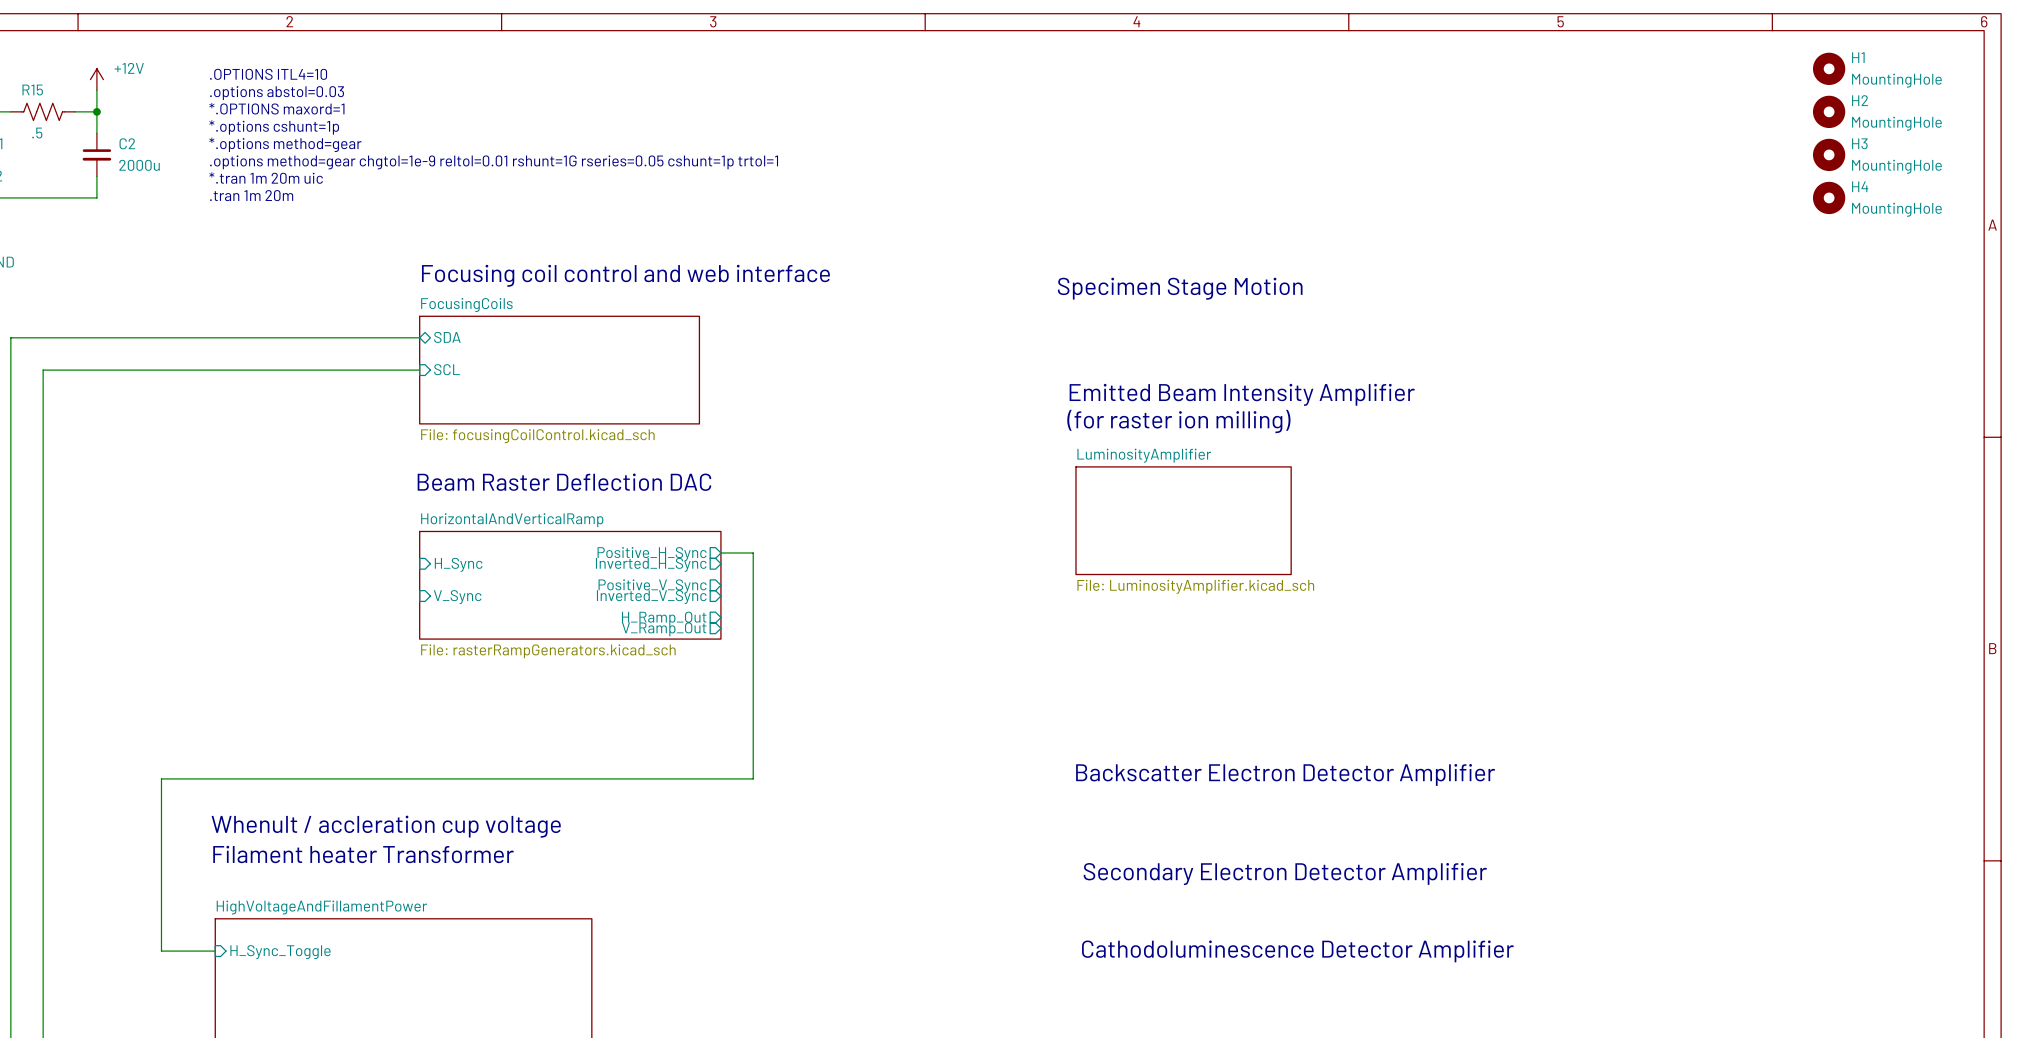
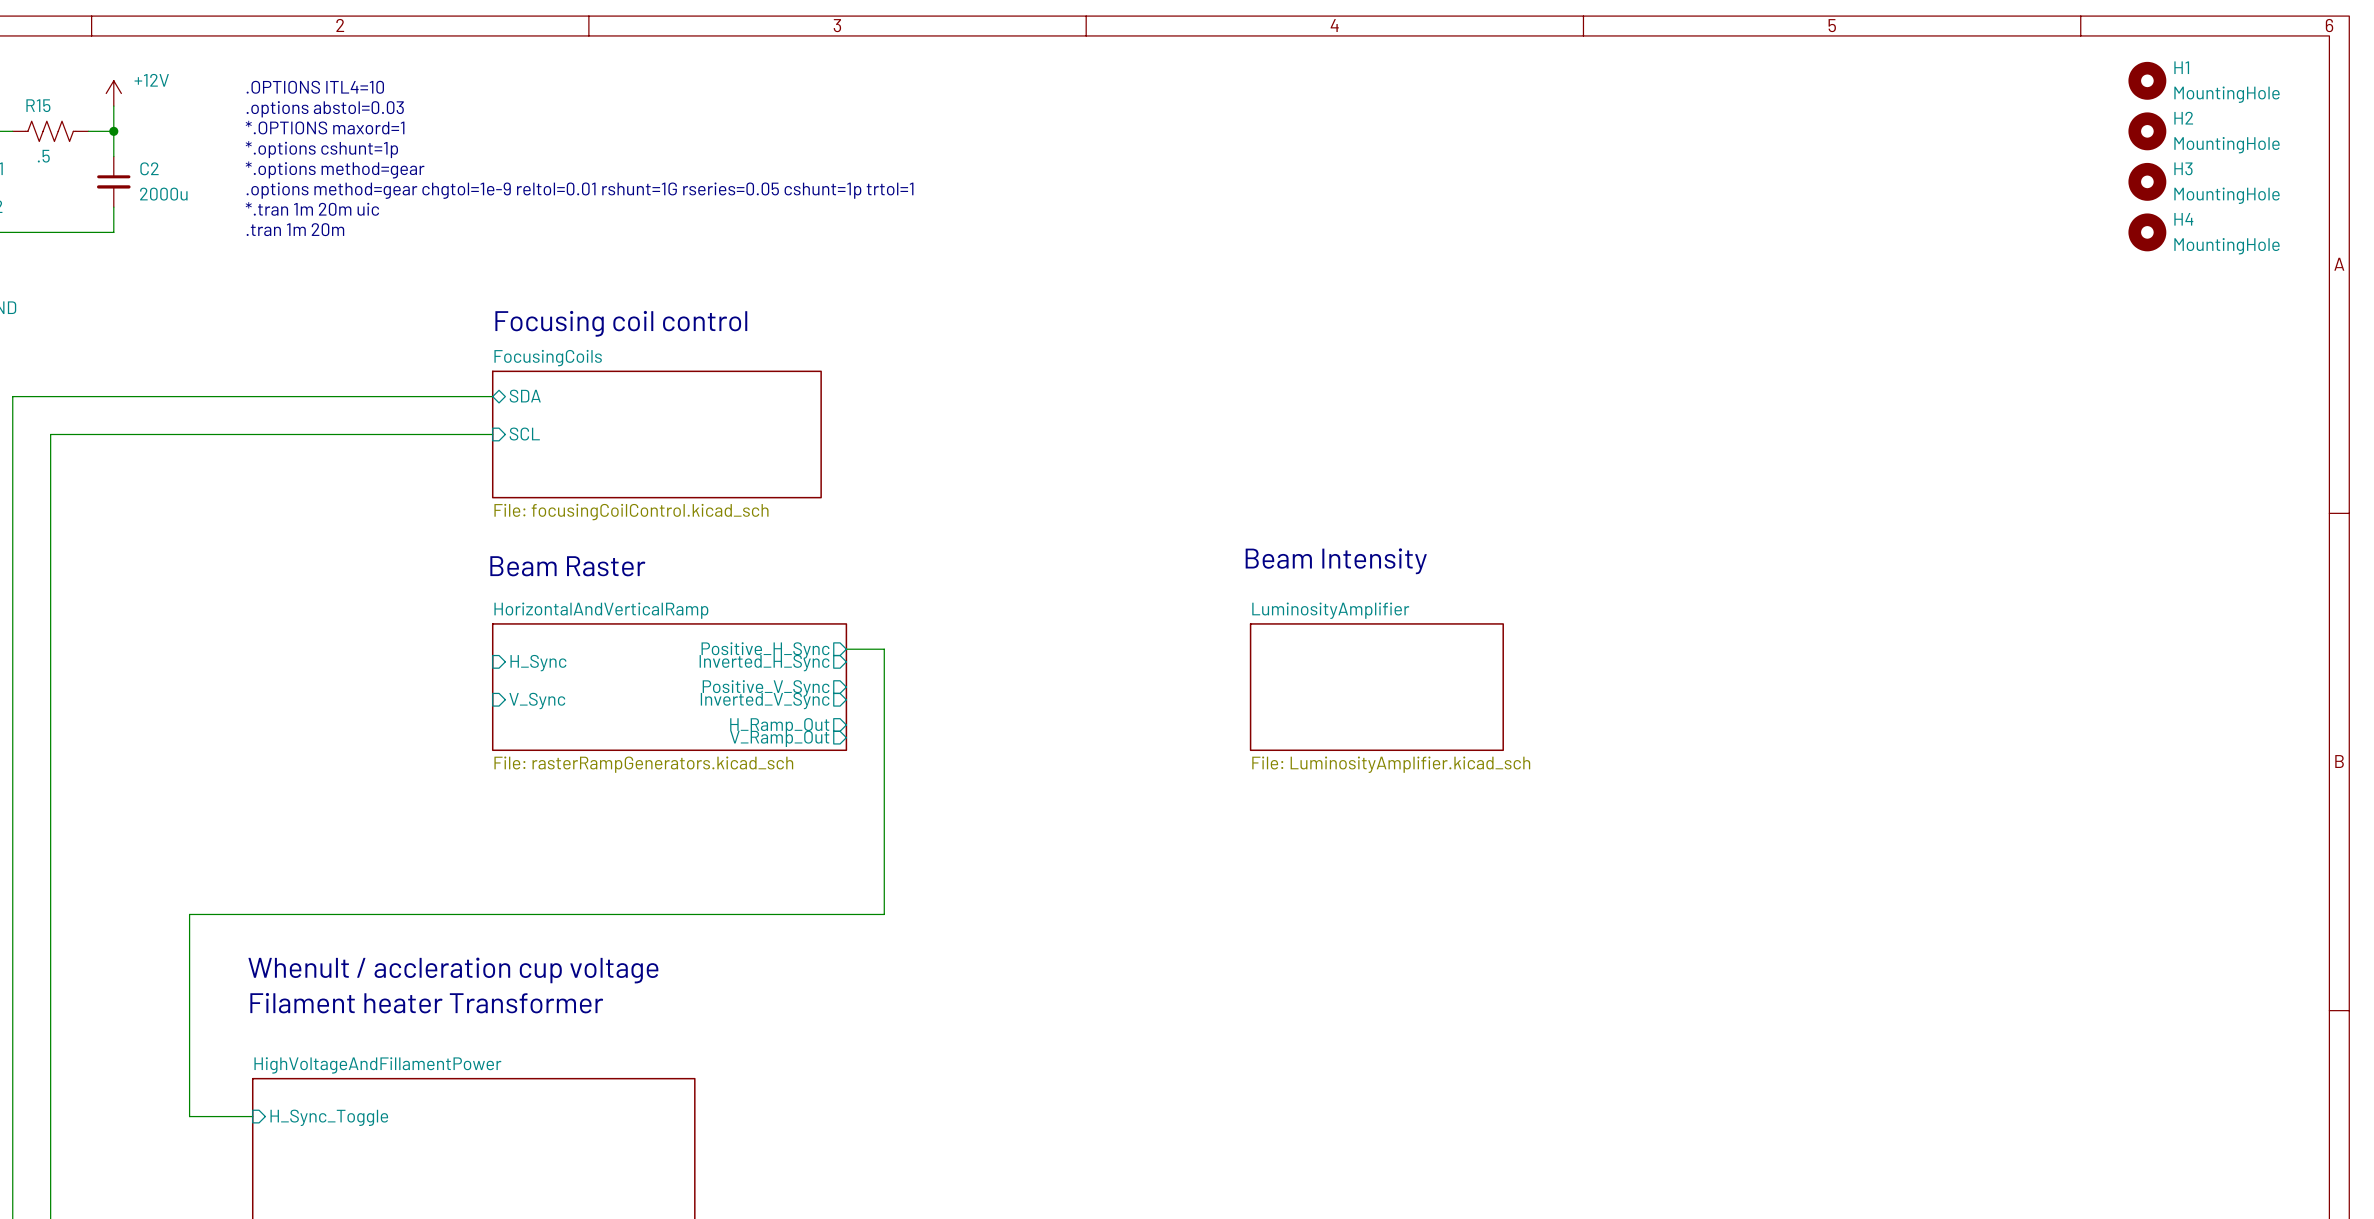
text: Focusing coil control and web interface (625, 275) -> Focusing coil control (621, 323)
text: Specimen Stage Motion (1180, 288) -> none
text: Emitted Beam Intensity Amplifier (1242, 394) -> none
text: (for raster ion milling) (1178, 421) -> none
text: none -> Beam Intensity (1336, 561)
text: Beam Raster Deflection DAC (564, 482) -> Beam Raster (567, 566)
sheet LuminosityAmplifier position: (1183, 520) -> (1376, 687)
text: Backscatter Electron Detector Amplifier (1285, 774) -> none
text: Secondary Electron Detector Amplifier (1285, 874) -> none
text: Cathodoluminescence Detector Amplifier (1297, 951) -> none

